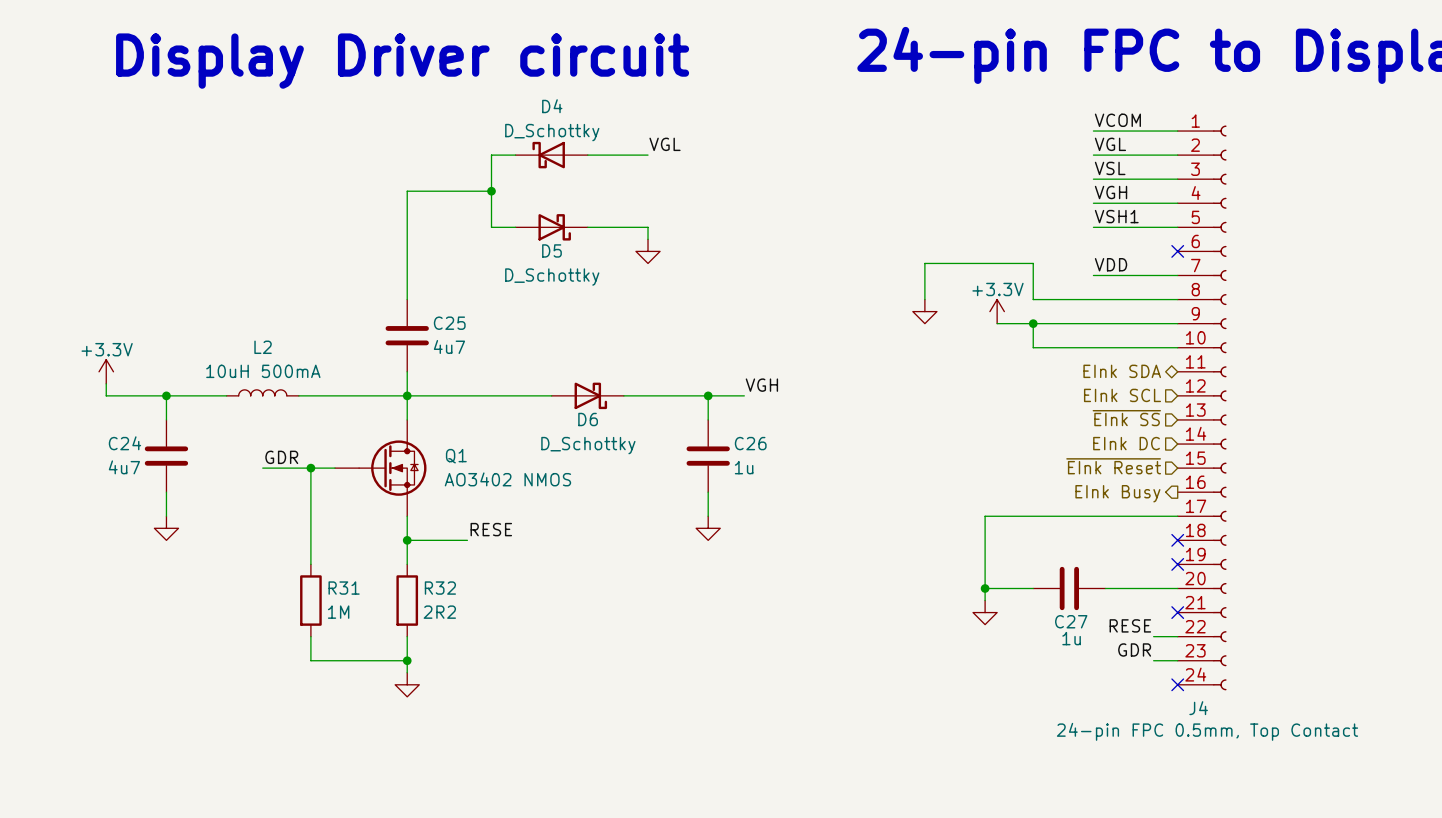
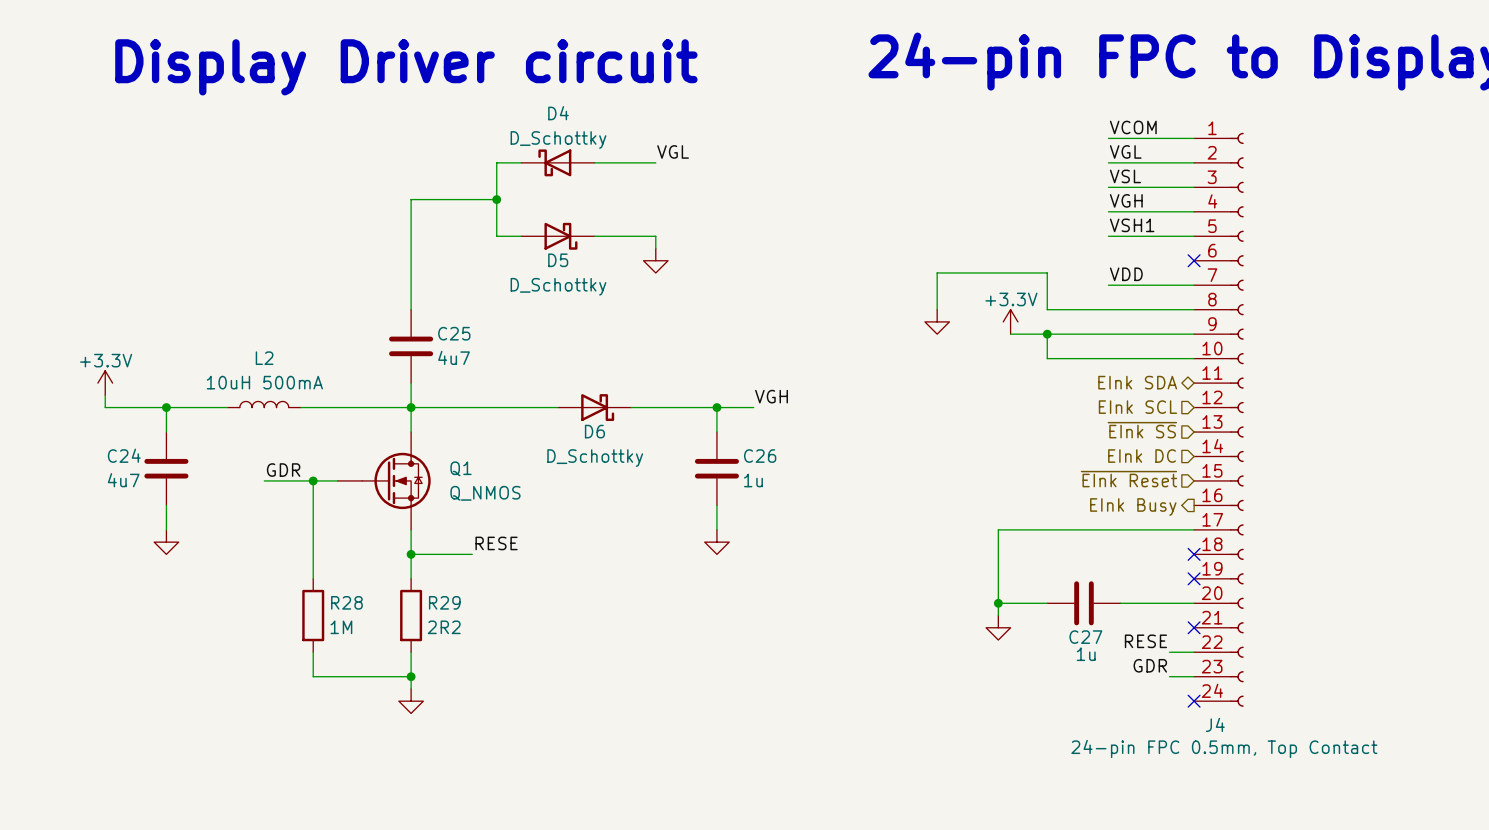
Q1 value: AO3402 NMOS (507, 479) -> Q_NMOS (485, 493)
R31 name: R31 (344, 588) -> R28 (346, 602)
R32 name: R32 (440, 588) -> R29 (444, 602)

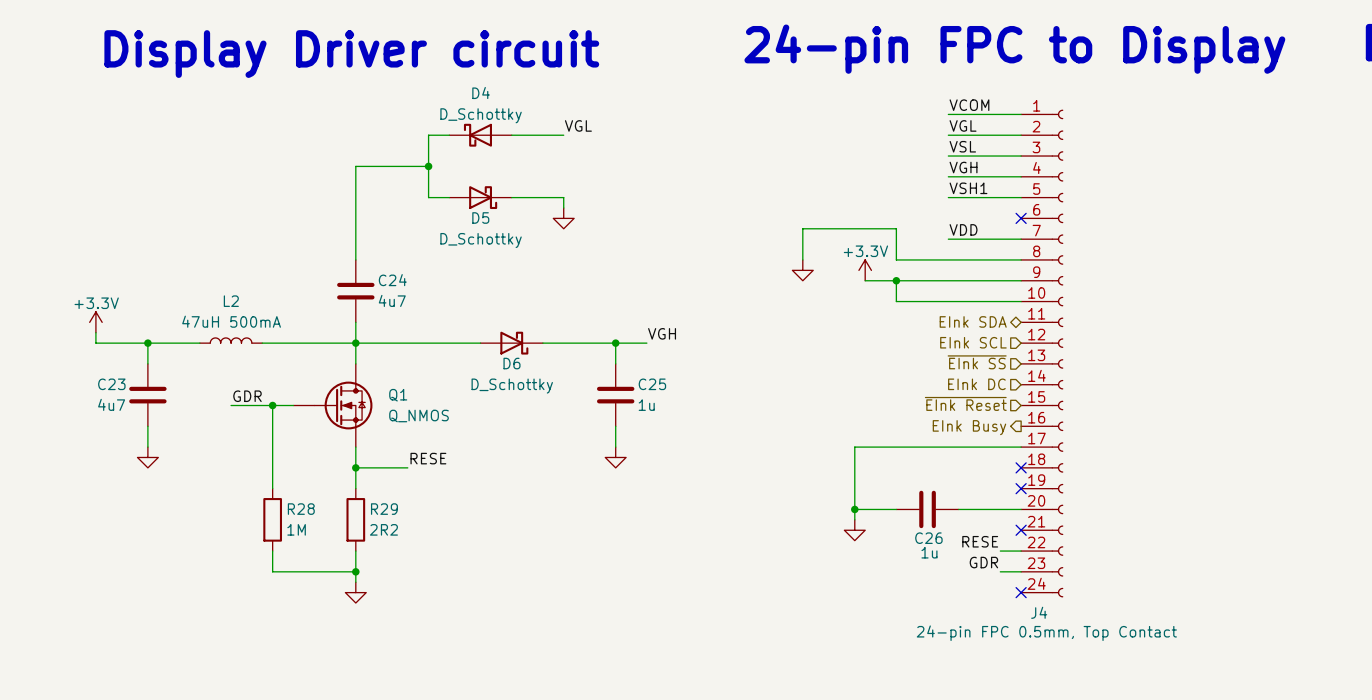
C25 name: C25 (454, 333) -> C24 (392, 280)
L2 value: 10uH 500mA (264, 382) -> 47uH 500mA (231, 321)
C24 name: C24 (124, 455) -> C23 (111, 384)
C26 name: C26 (760, 456) -> C25 (652, 384)
C27 name: C27 (1085, 637) -> C26 (928, 538)

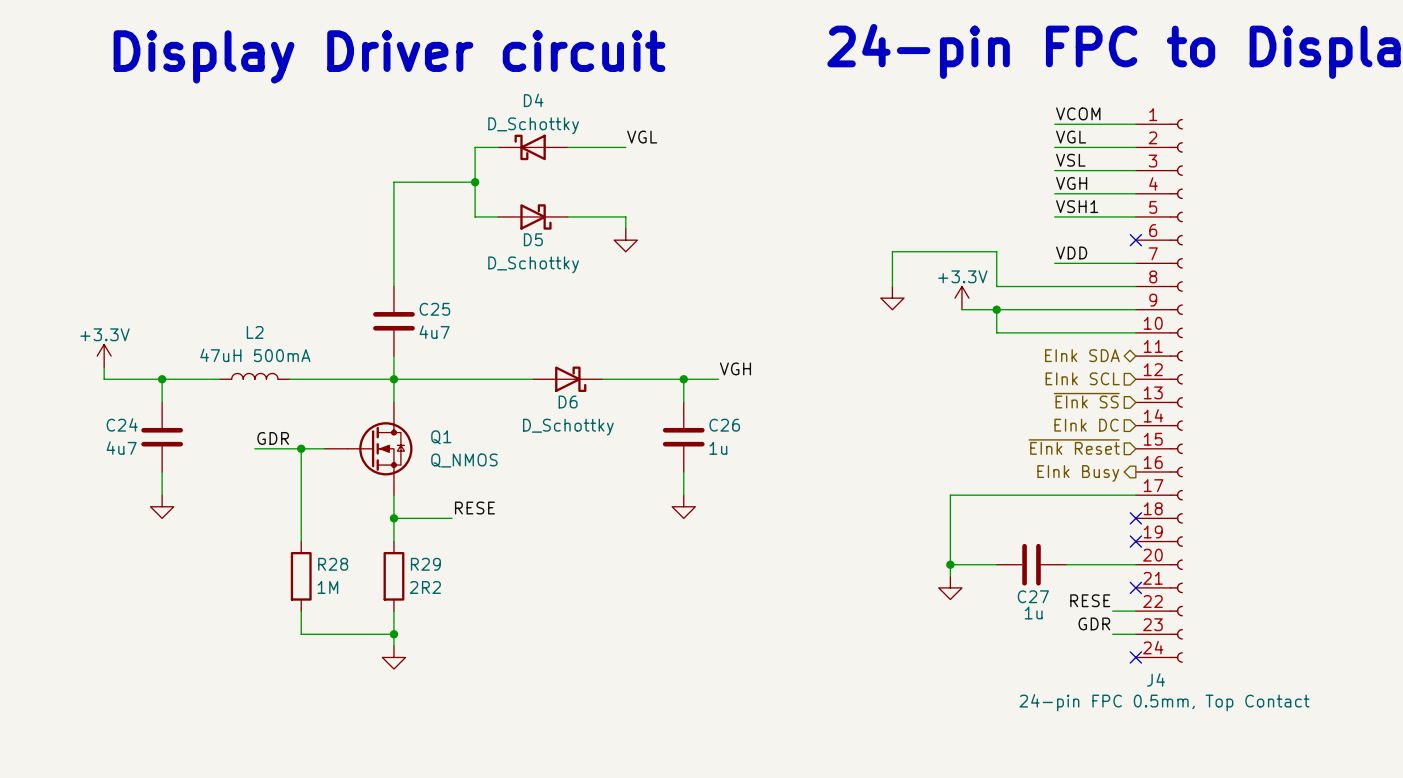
C24 name: C24 (392, 280) -> C25 (434, 309)
C23 name: C23 (111, 384) -> C24 (122, 424)
C25 name: C25 (652, 384) -> C26 (724, 425)
C26 name: C26 (928, 538) -> C27 (1033, 596)

